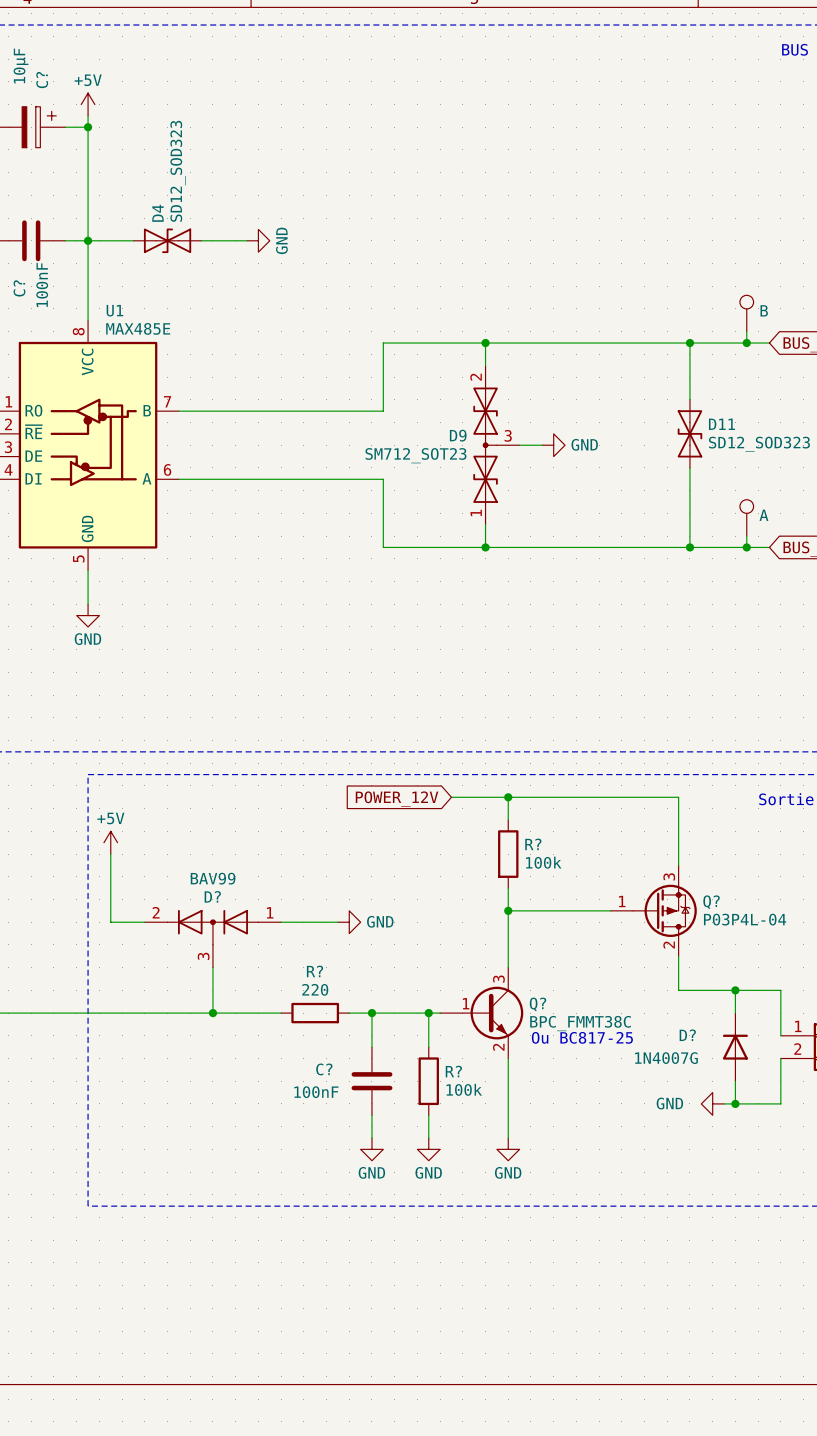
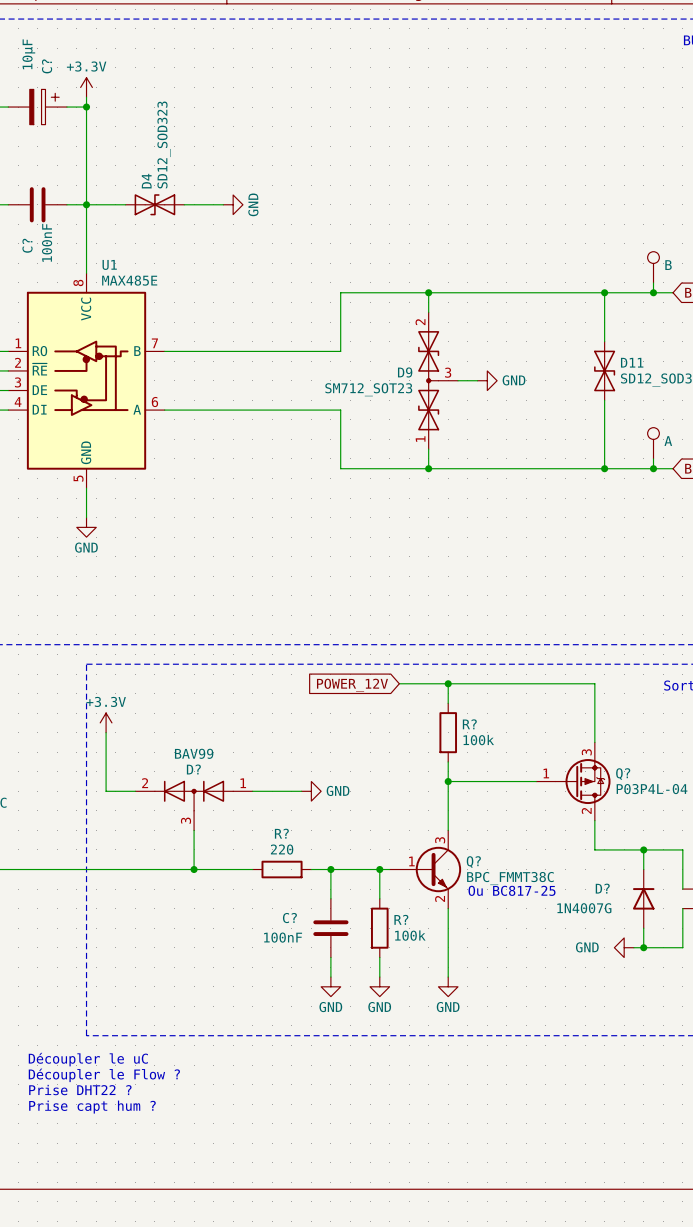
power symbol: +5V (88, 104) -> +3.3V (86, 87)
power symbol: +5V (110, 842) -> +3.3V (106, 722)
text: none -> Découpler le uC (88, 1059)
text: none -> Découpler le Flow ? (104, 1075)
text: none -> Prise DHT22 ? (80, 1090)
text: none -> Prise capt hum ? (92, 1107)

